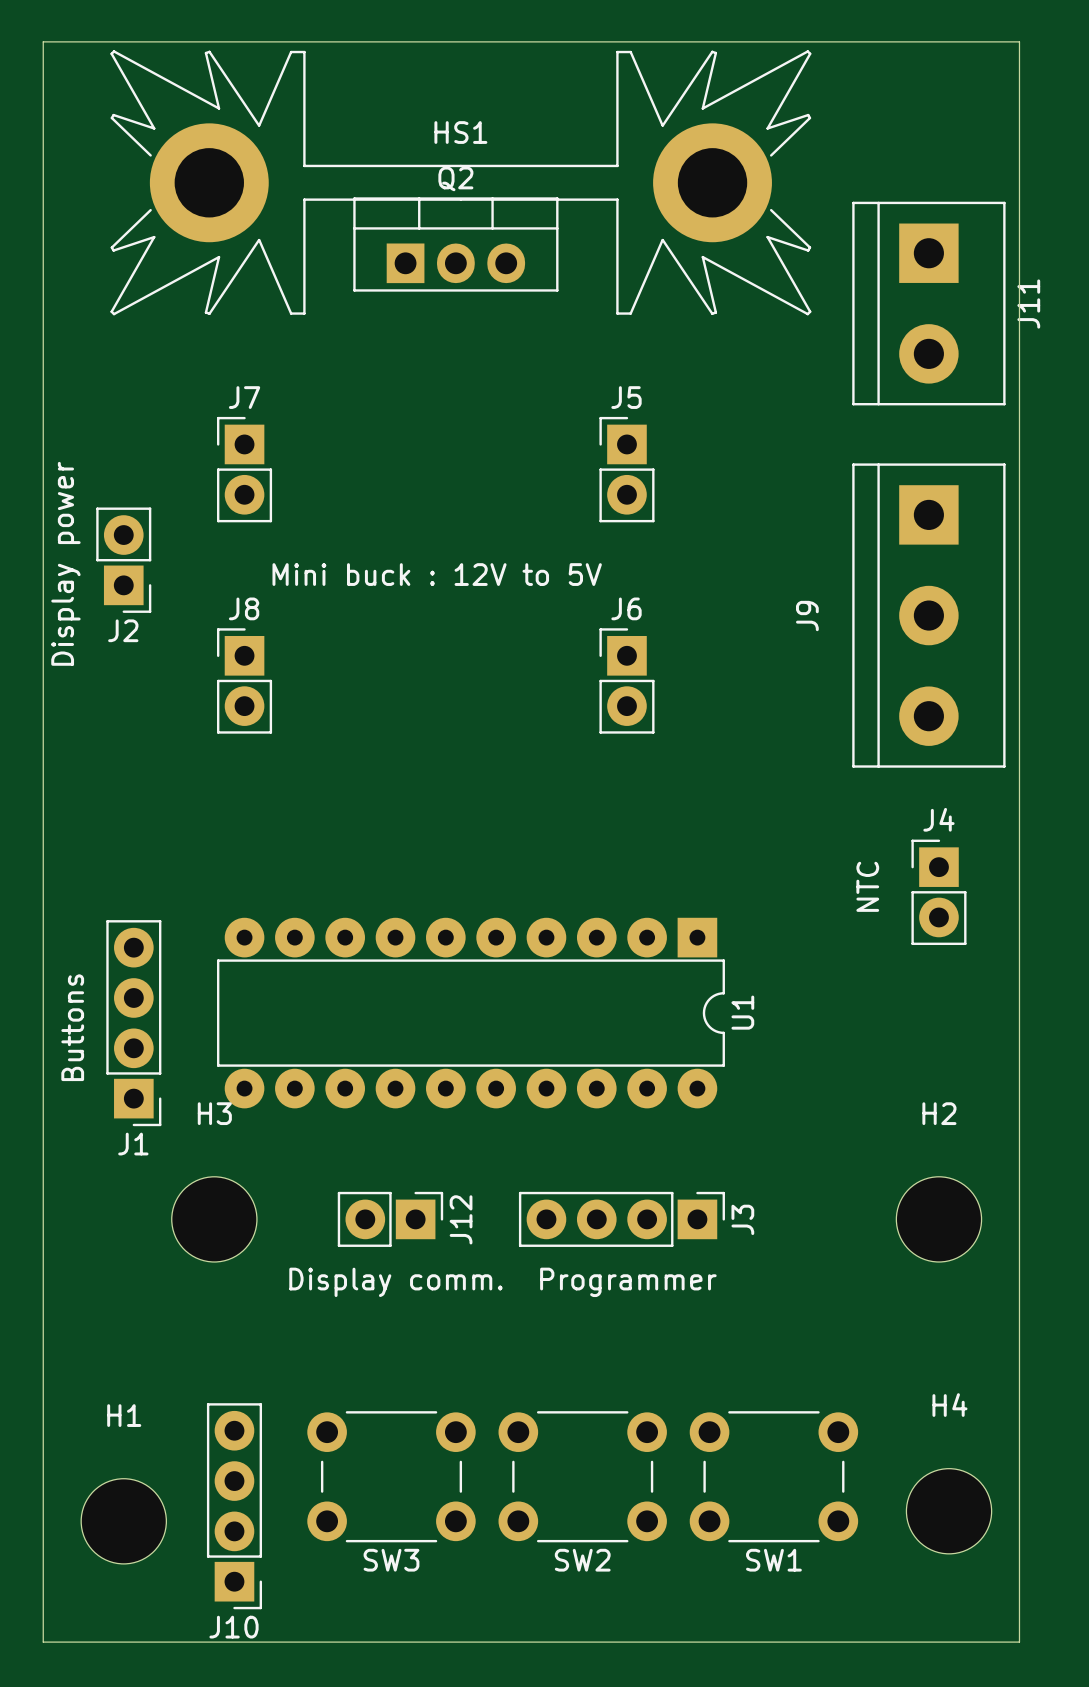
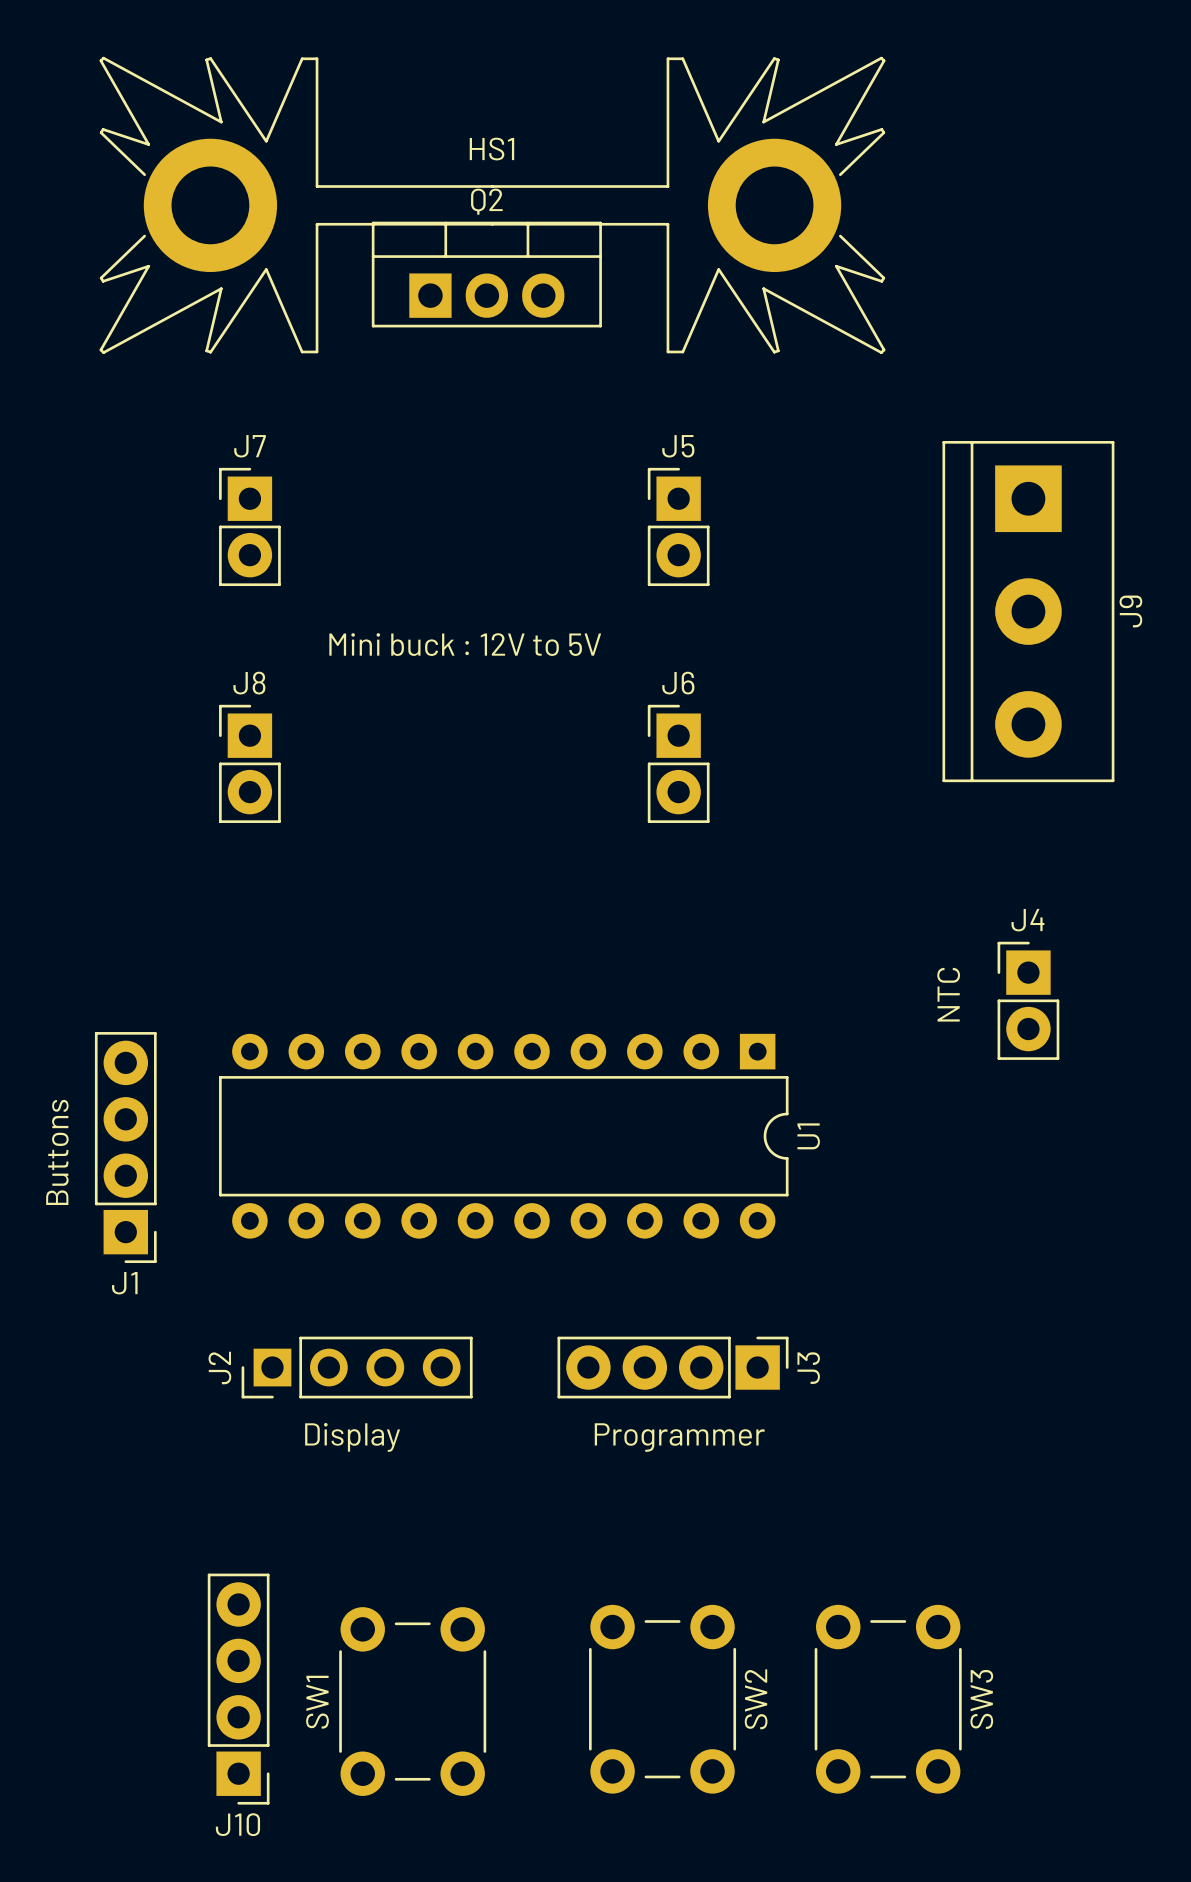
board edge: (43, 41) (43, 1642) (1019, 1642) (1019, 41) (43, 41) -> none
J11: (928, 303) -> none
J2 footprint: [96, 507, 152, 613] -> [241, 1336, 473, 1399]
text: Display power (65, 563) -> none
J9 position: (928, 615) -> (1028, 611)
J9 name position: J9 (807, 616) -> J9 (1130, 611)
J2 name position: J2 (123, 630) -> J2 (219, 1367)
U1 footprint: [217, 917, 725, 1109] -> [219, 1033, 789, 1239]
H3: (214, 1219) -> none
J12: (390, 1219) -> none
H2: (938, 1219) -> none
text: Display comm. (395, 1282) -> Display (352, 1437)
SW3 rotation: 0° (391, 1476) -> 90° clockwise (888, 1699)
SW3 position: (391, 1476) -> (888, 1699)
SW2 rotation: 0° (582, 1476) -> 90° clockwise (662, 1699)
SW1 rotation: 0° (773, 1476) -> 90° clockwise (412, 1701)
SW1 position: (773, 1476) -> (412, 1701)
H4: (949, 1511) -> none
H1: (123, 1521) -> none
SW3 name position: SW3 (391, 1560) -> SW3 (981, 1699)
SW2 name position: SW2 (582, 1560) -> SW2 (756, 1699)

